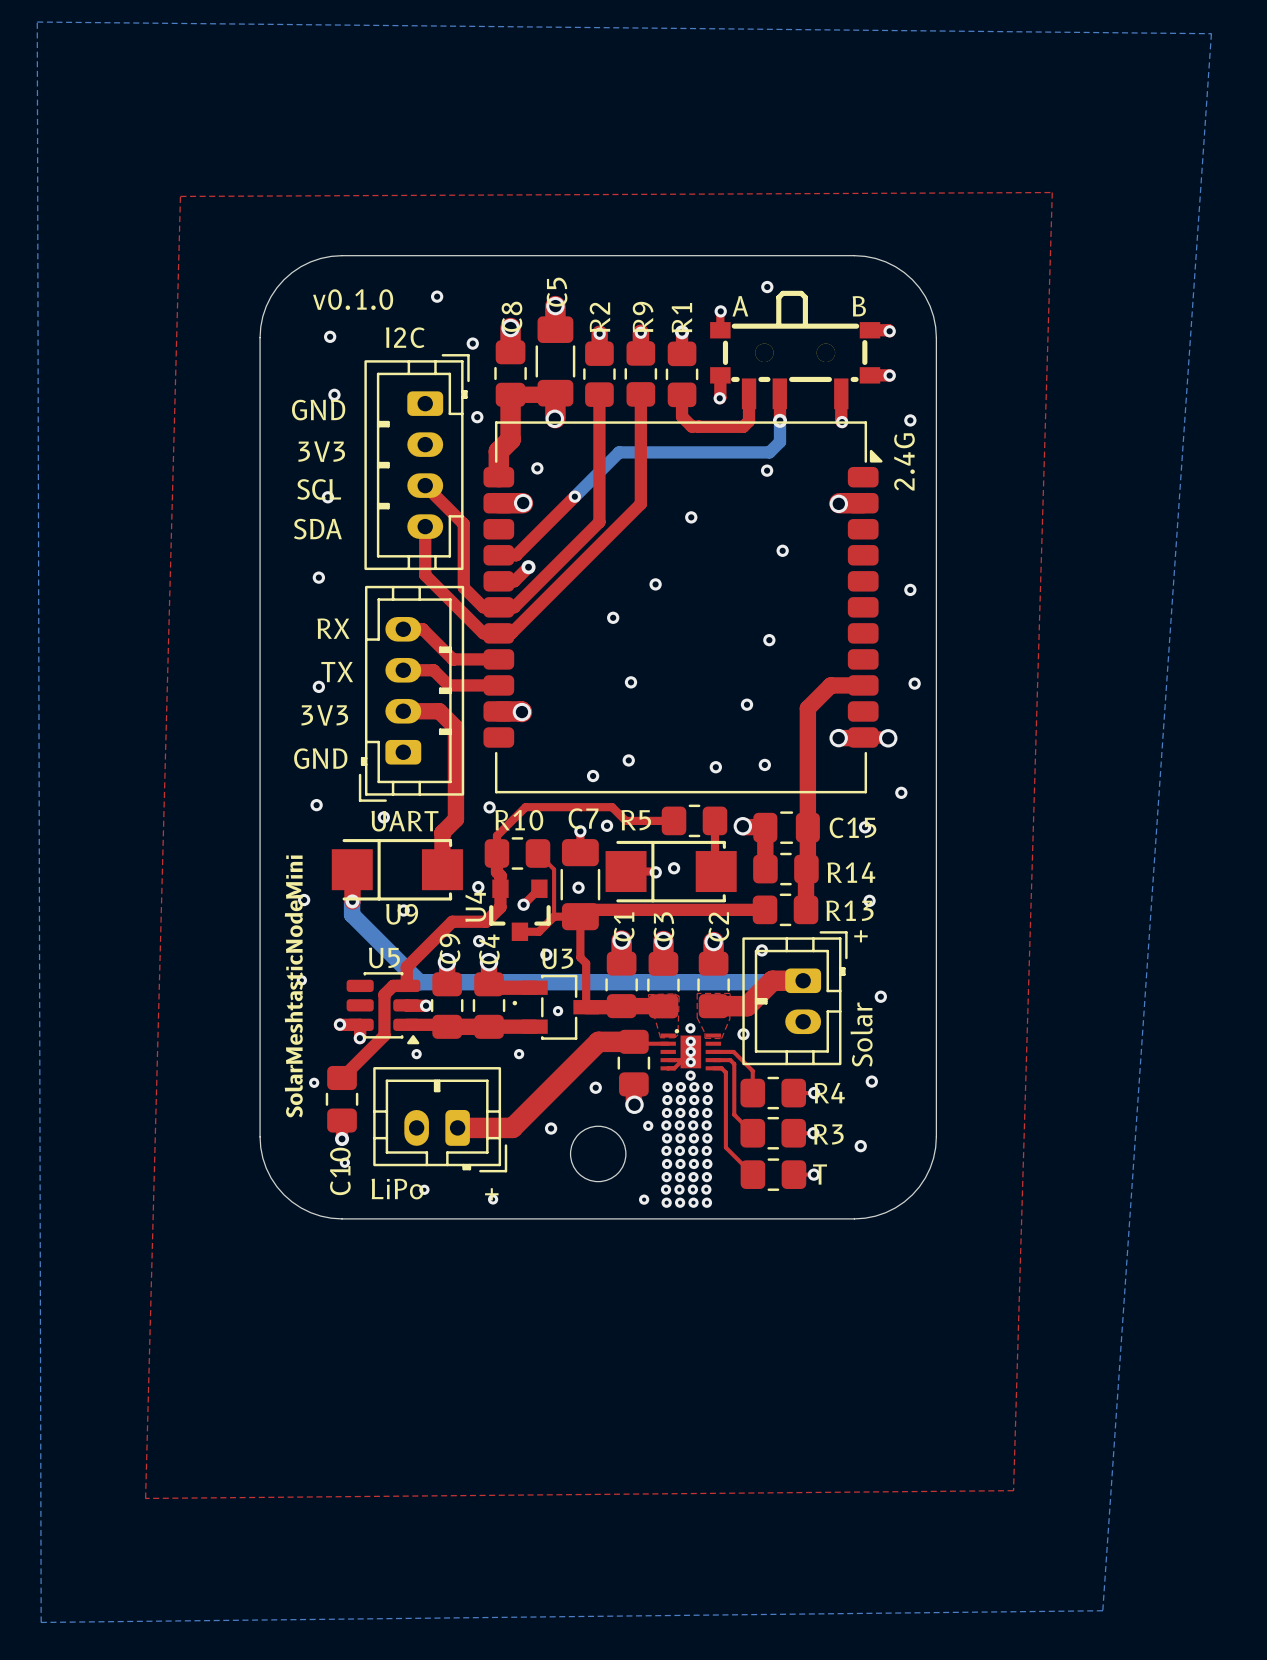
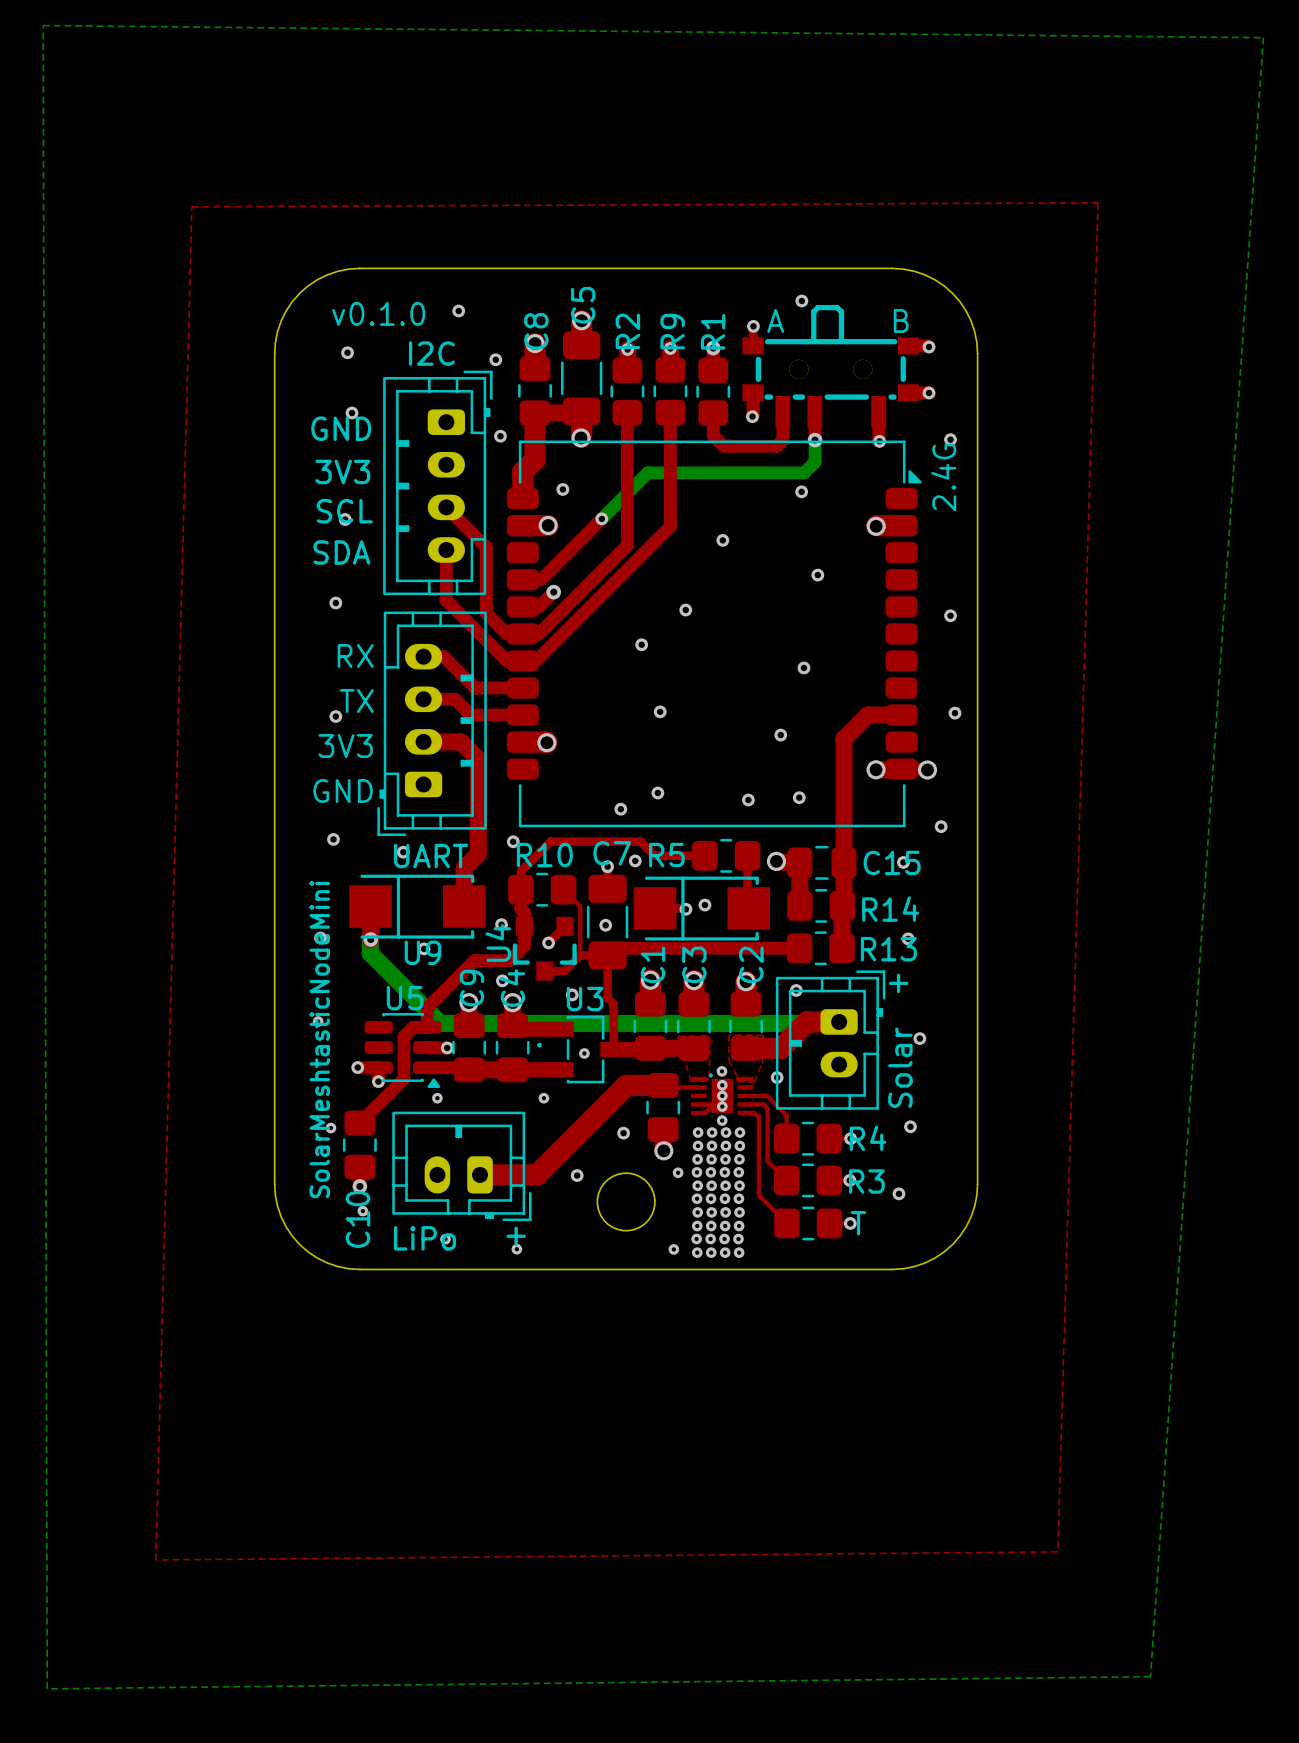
text position: SolarMeshtasticNodeMini (293, 986) -> SolarMeshtasticNodeMini (319, 1039)

